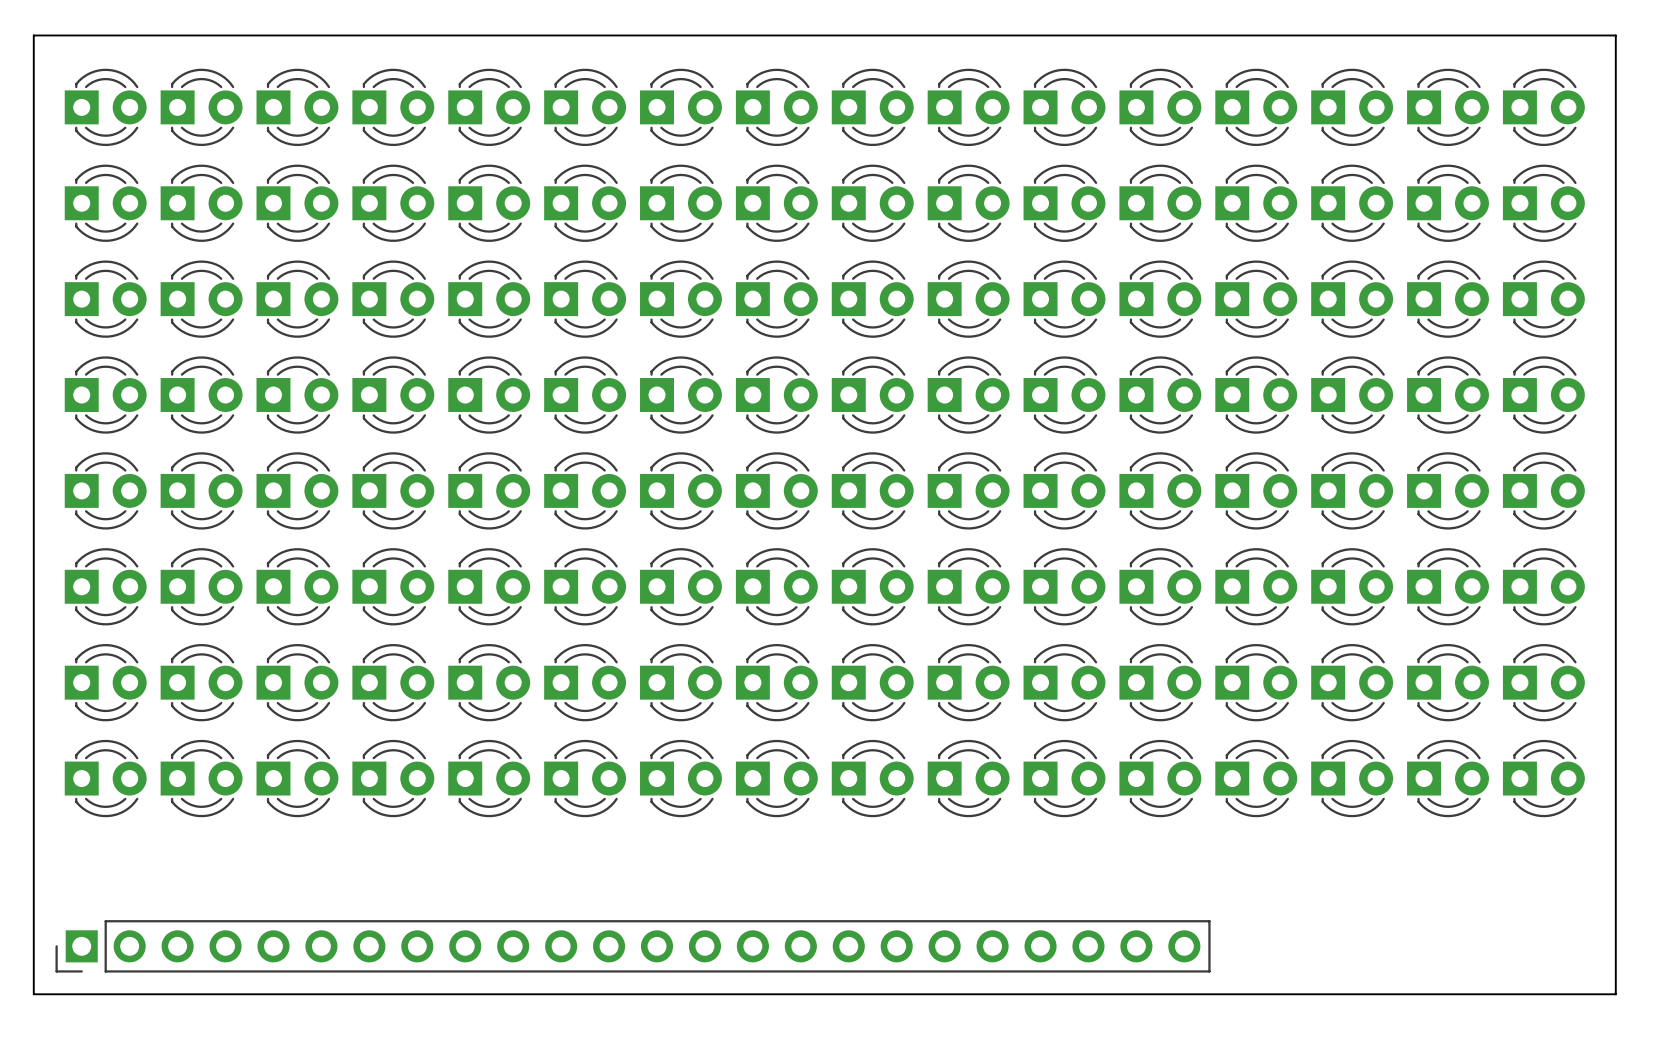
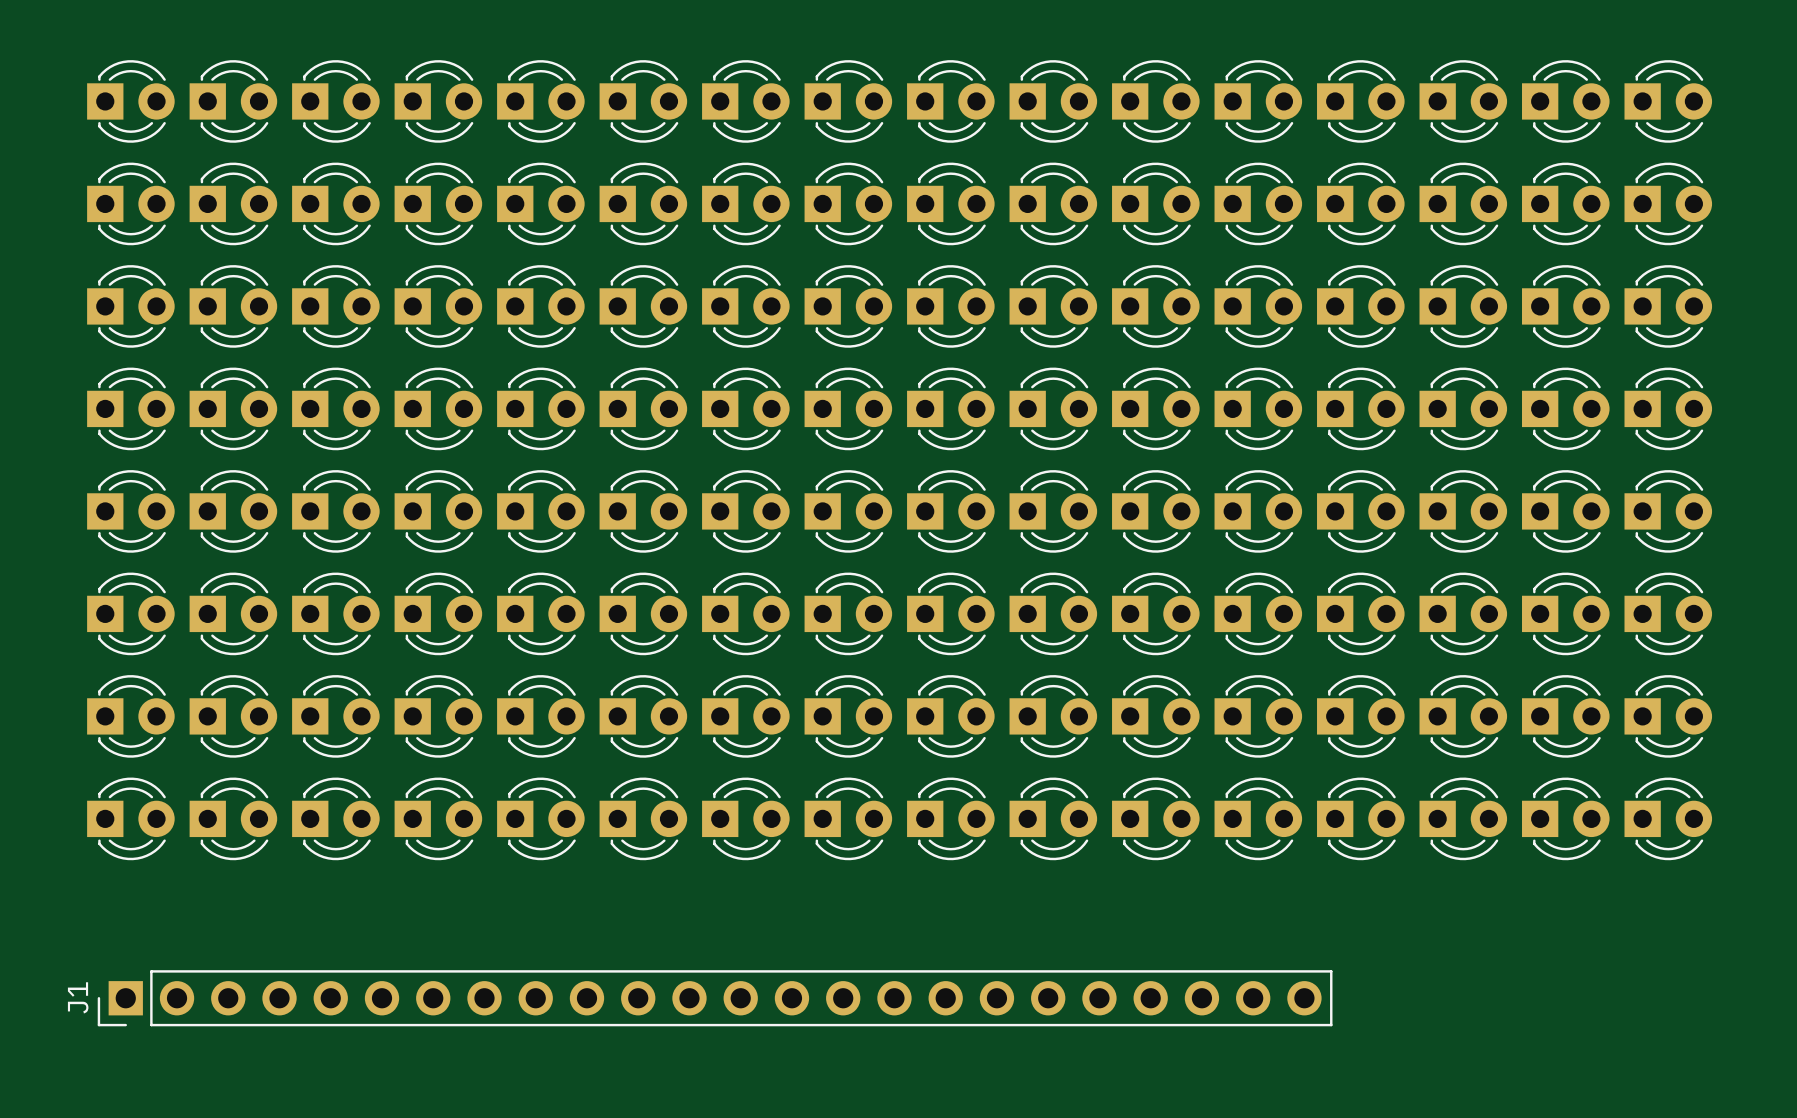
board edge: (33, 35) (1615, 35) (1615, 994) (33, 994) (33, 35) -> none
part: (633, 946) -> none
J1: none -> (715, 998)

